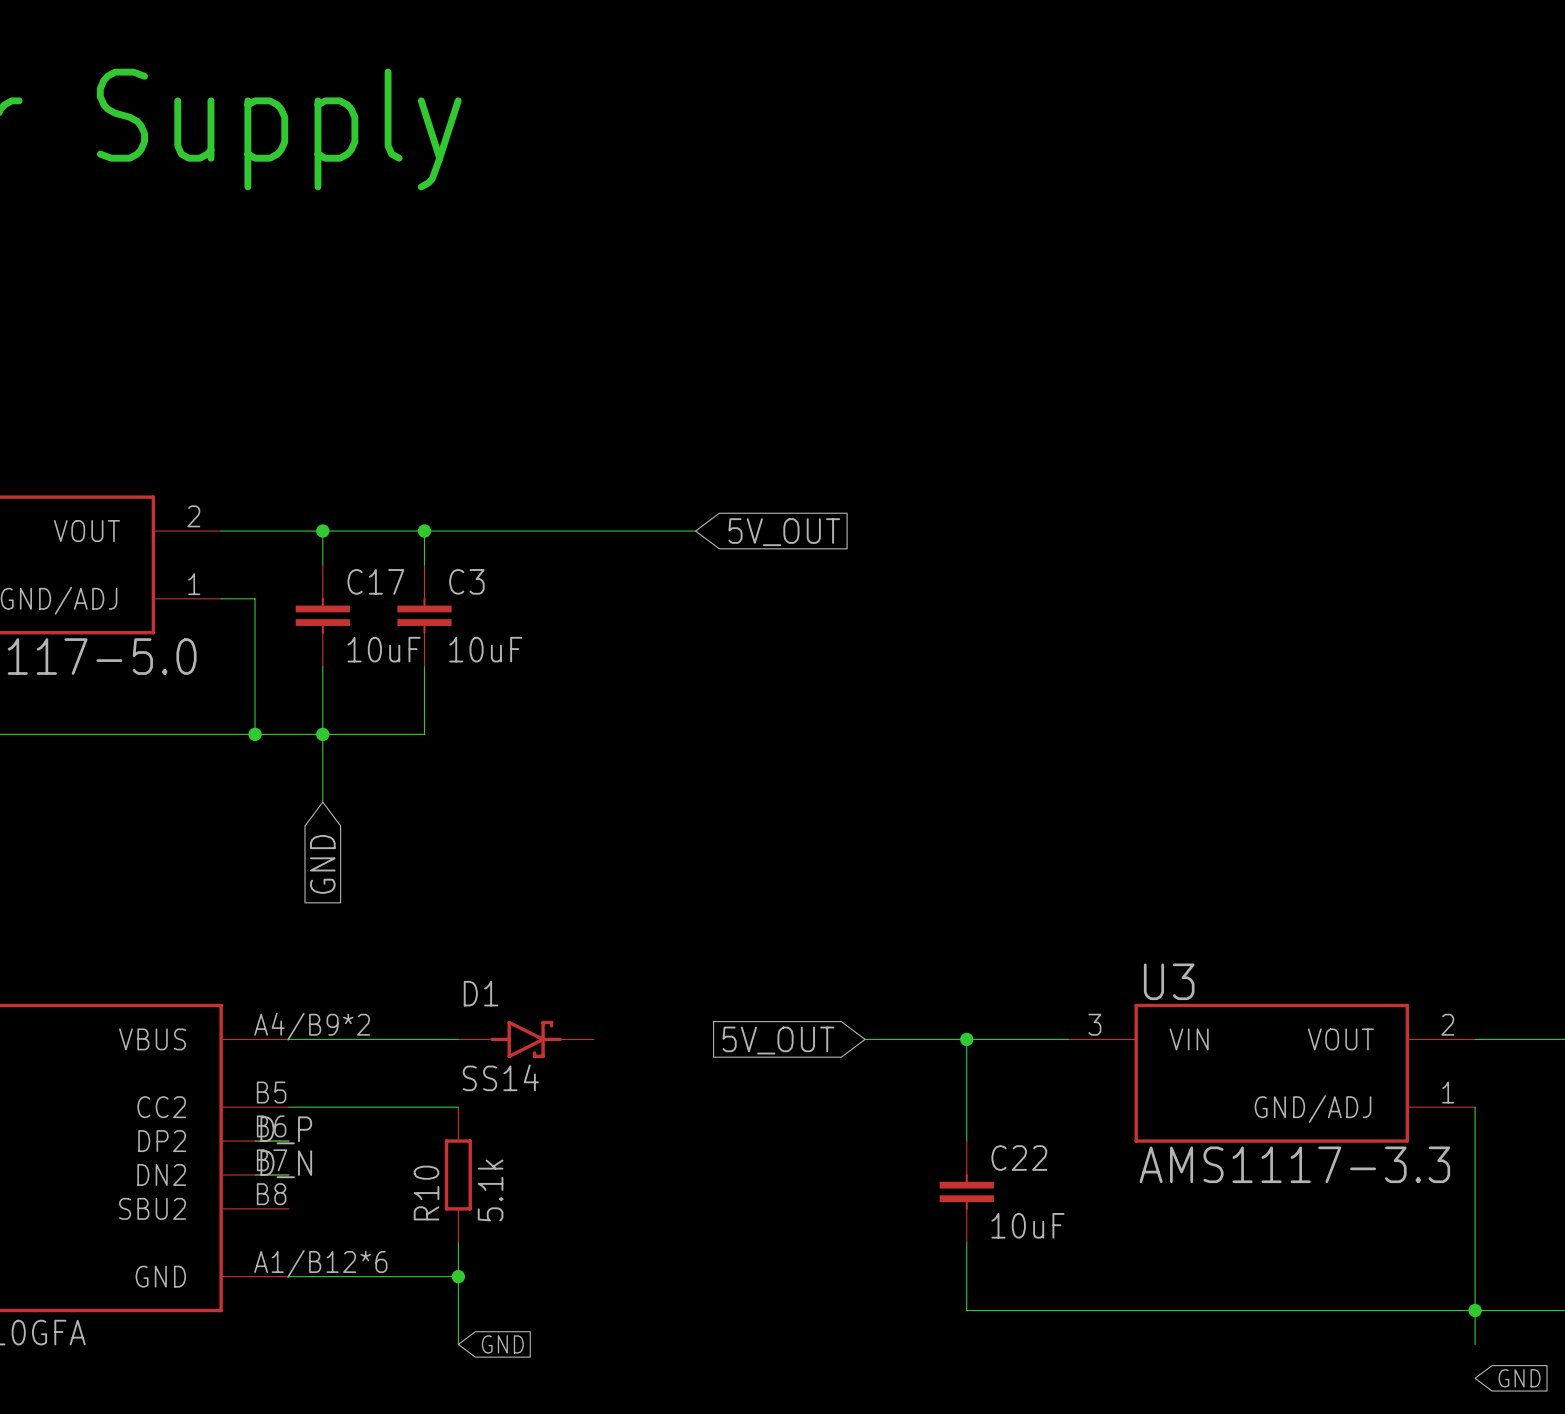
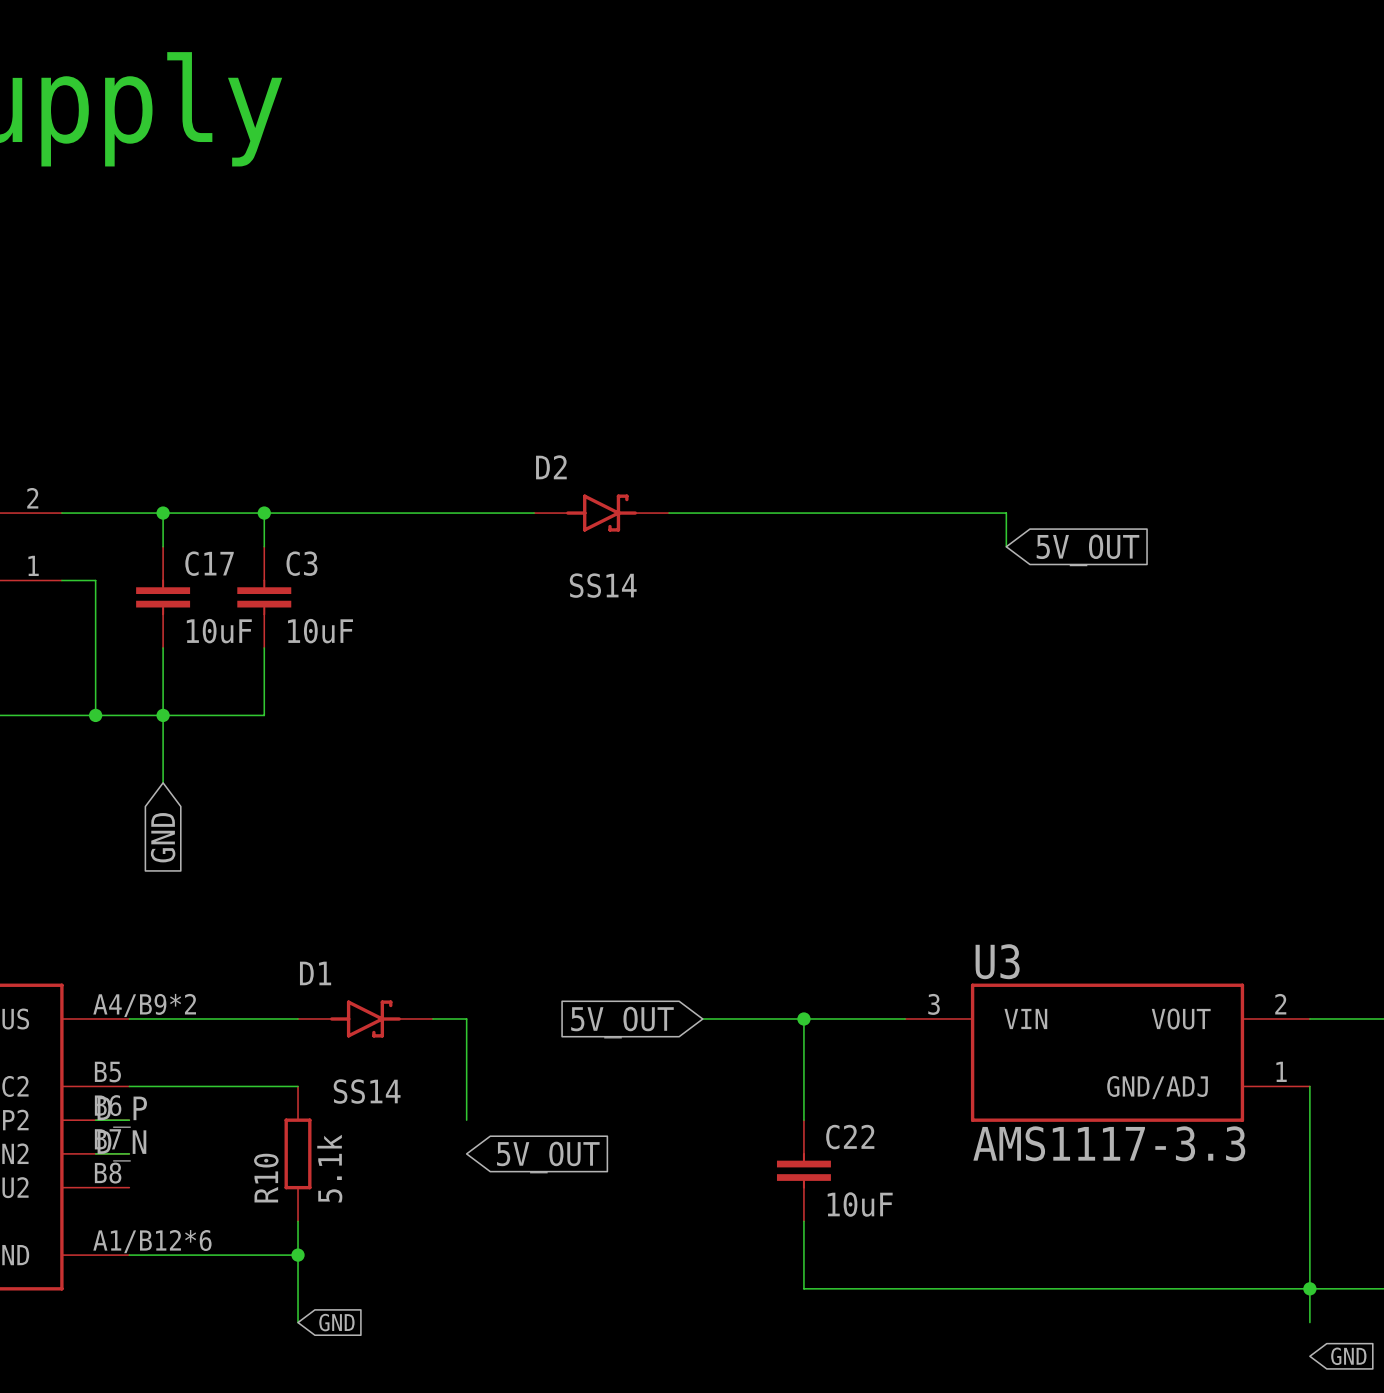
D2: none -> SS14 (601, 513)
wire: none -> (669, 513) (1006, 513) (1006, 546)
global label: 5V_OUT (784, 532) -> none
global label: none -> 5V_OUT (1087, 550)
wire: none -> (432, 1018) (466, 1018) (466, 1120)
D1 value position: SS14 (500, 1077) -> SS14 (367, 1091)
global label: none -> 5V_OUT (548, 1157)

